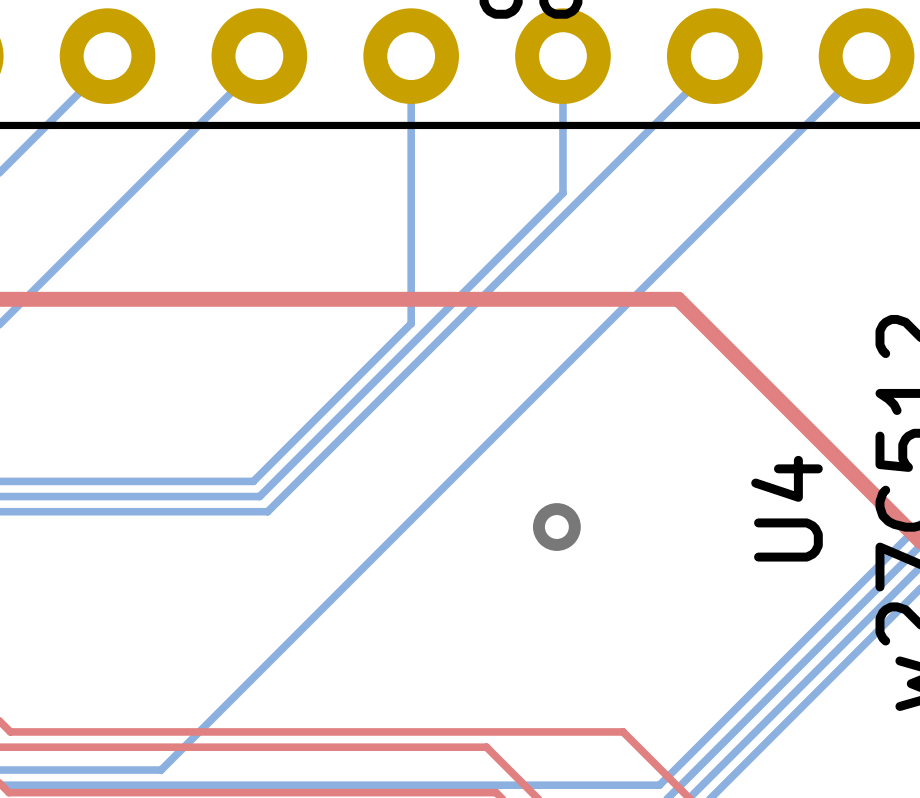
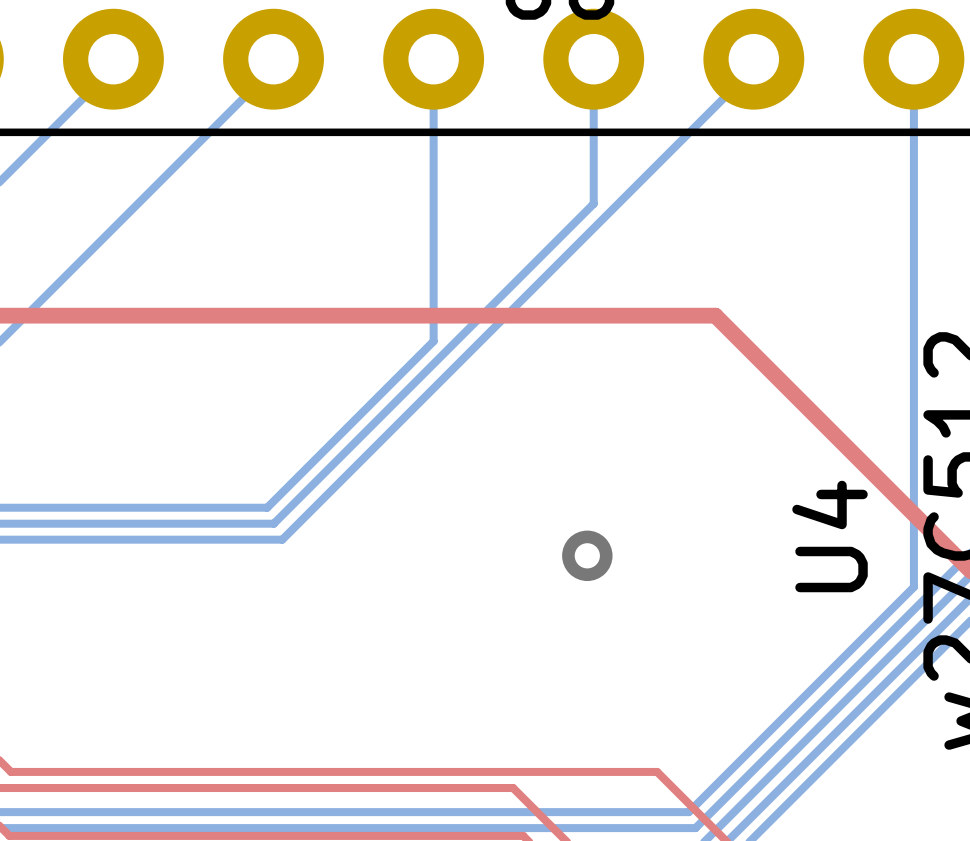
bottom track: (866, 64) (161, 770) -> (913, 68) (913, 587) (688, 812) (169, 812)

